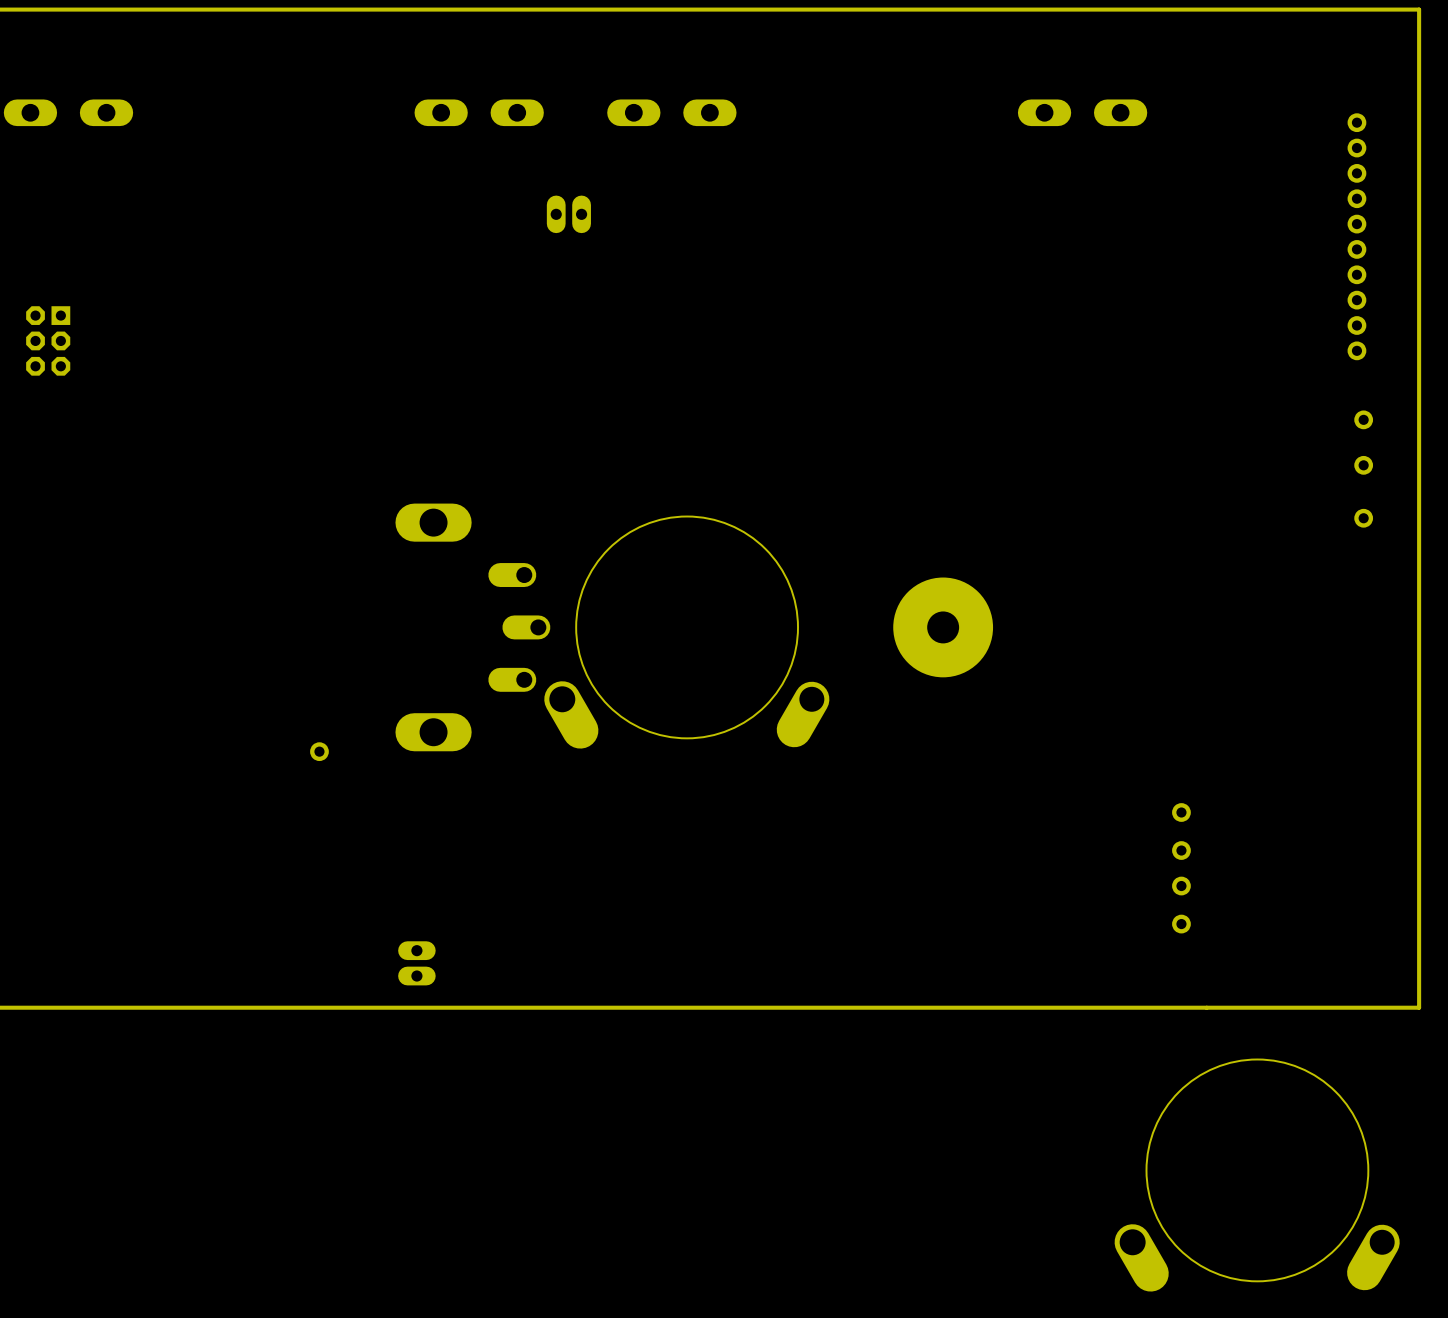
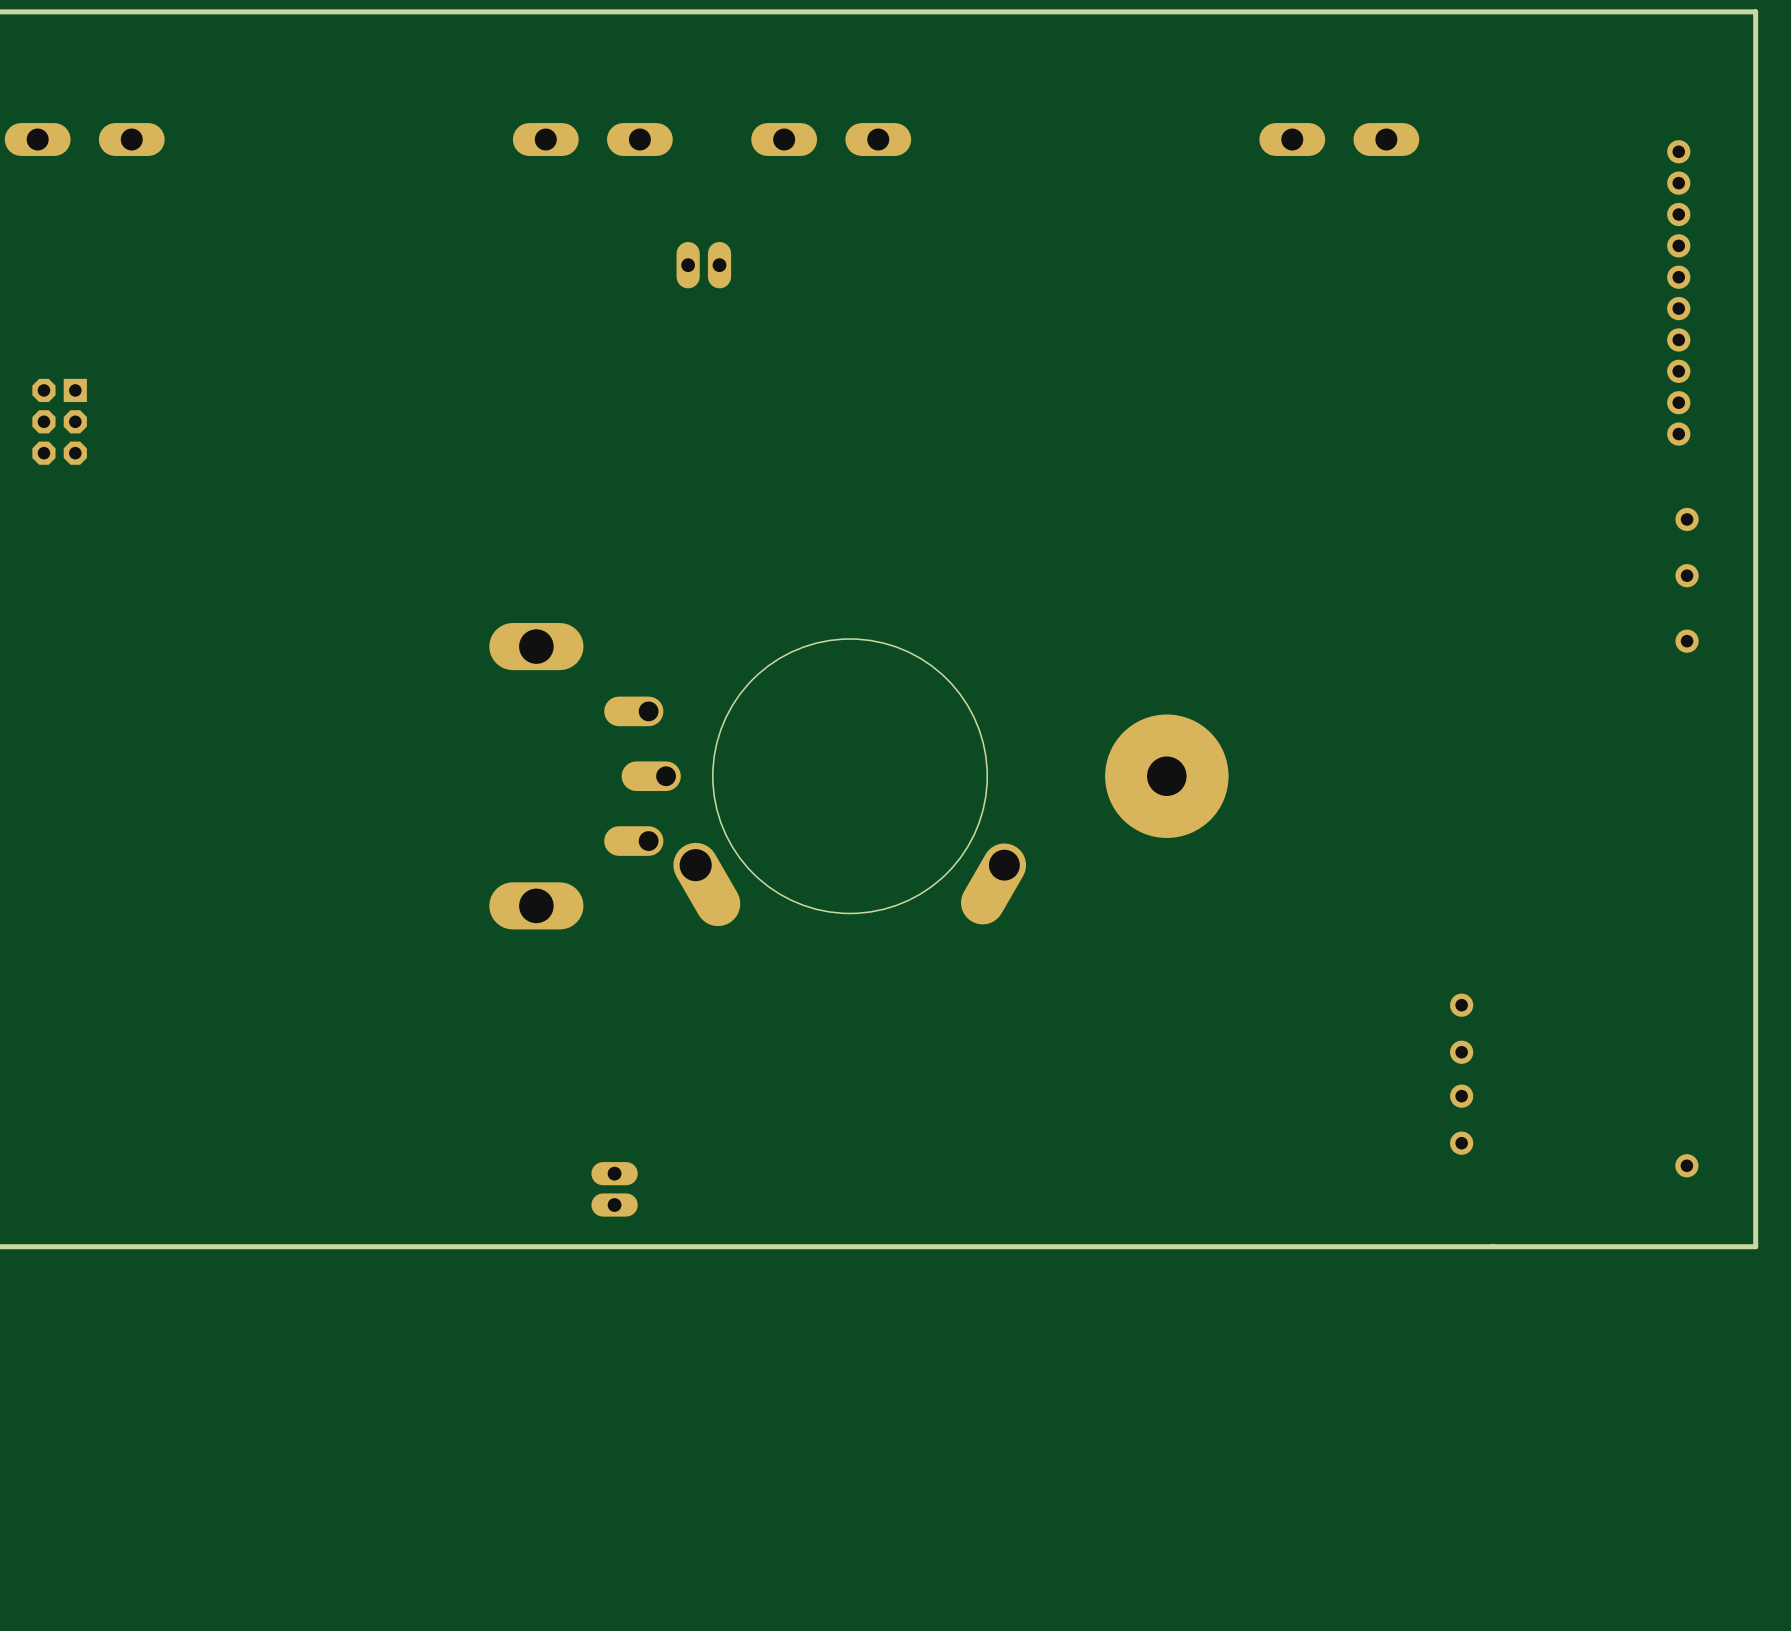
part: (319, 751) -> none
part: none -> (1686, 1165)
part position: (416, 963) -> (614, 1189)
part: (1257, 1175) -> none

